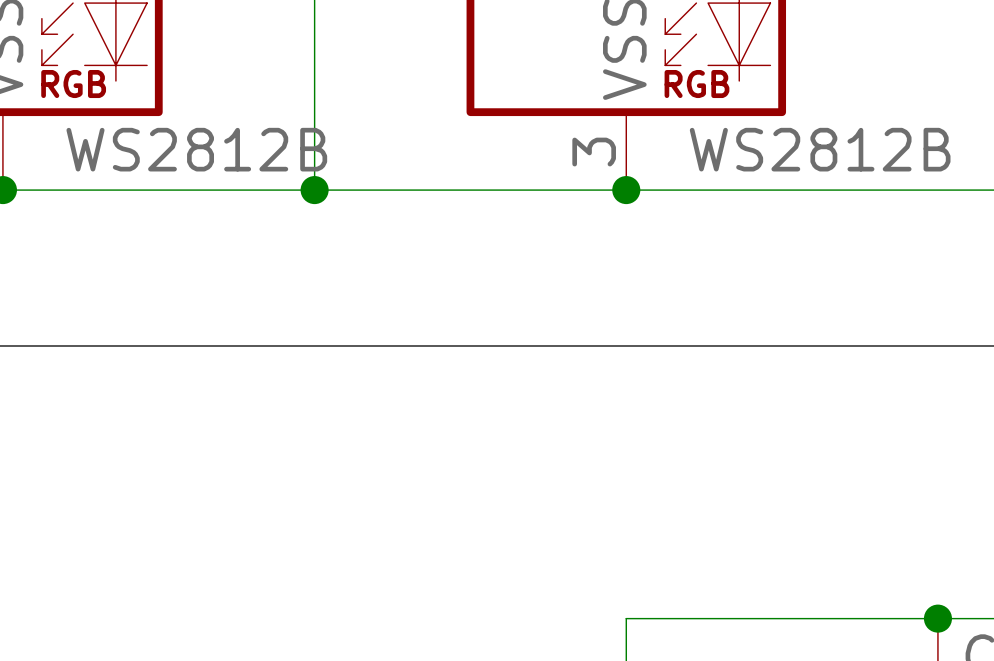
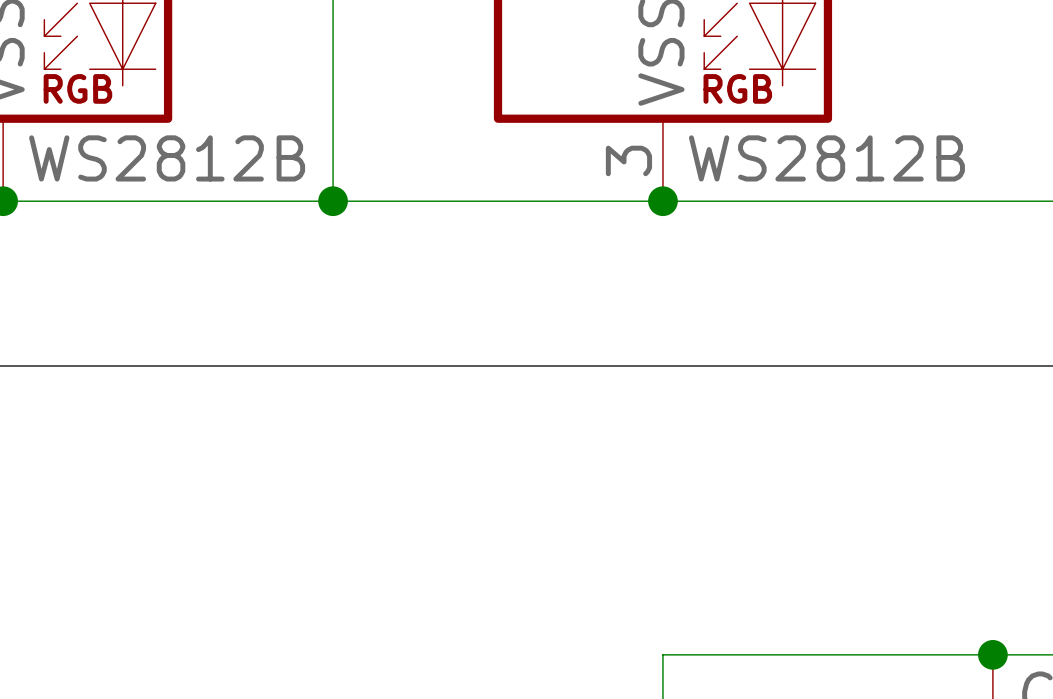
part text position: WS2812B (196, 149) -> WS2812B (167, 158)
part text position: WS2812B (820, 149) -> WS2812B (826, 158)

